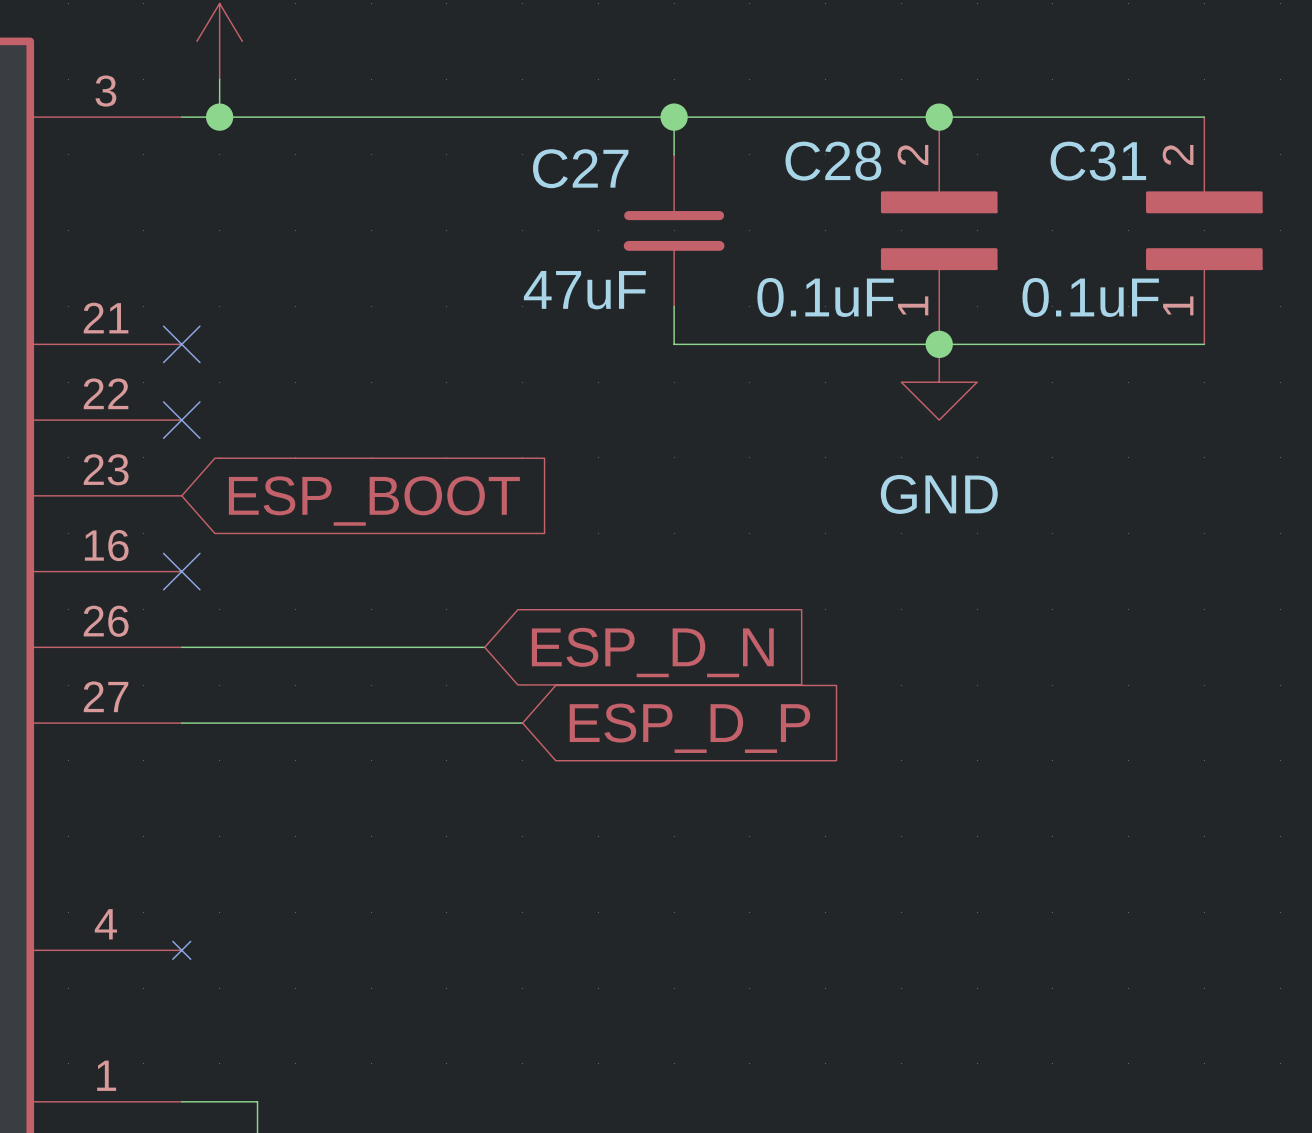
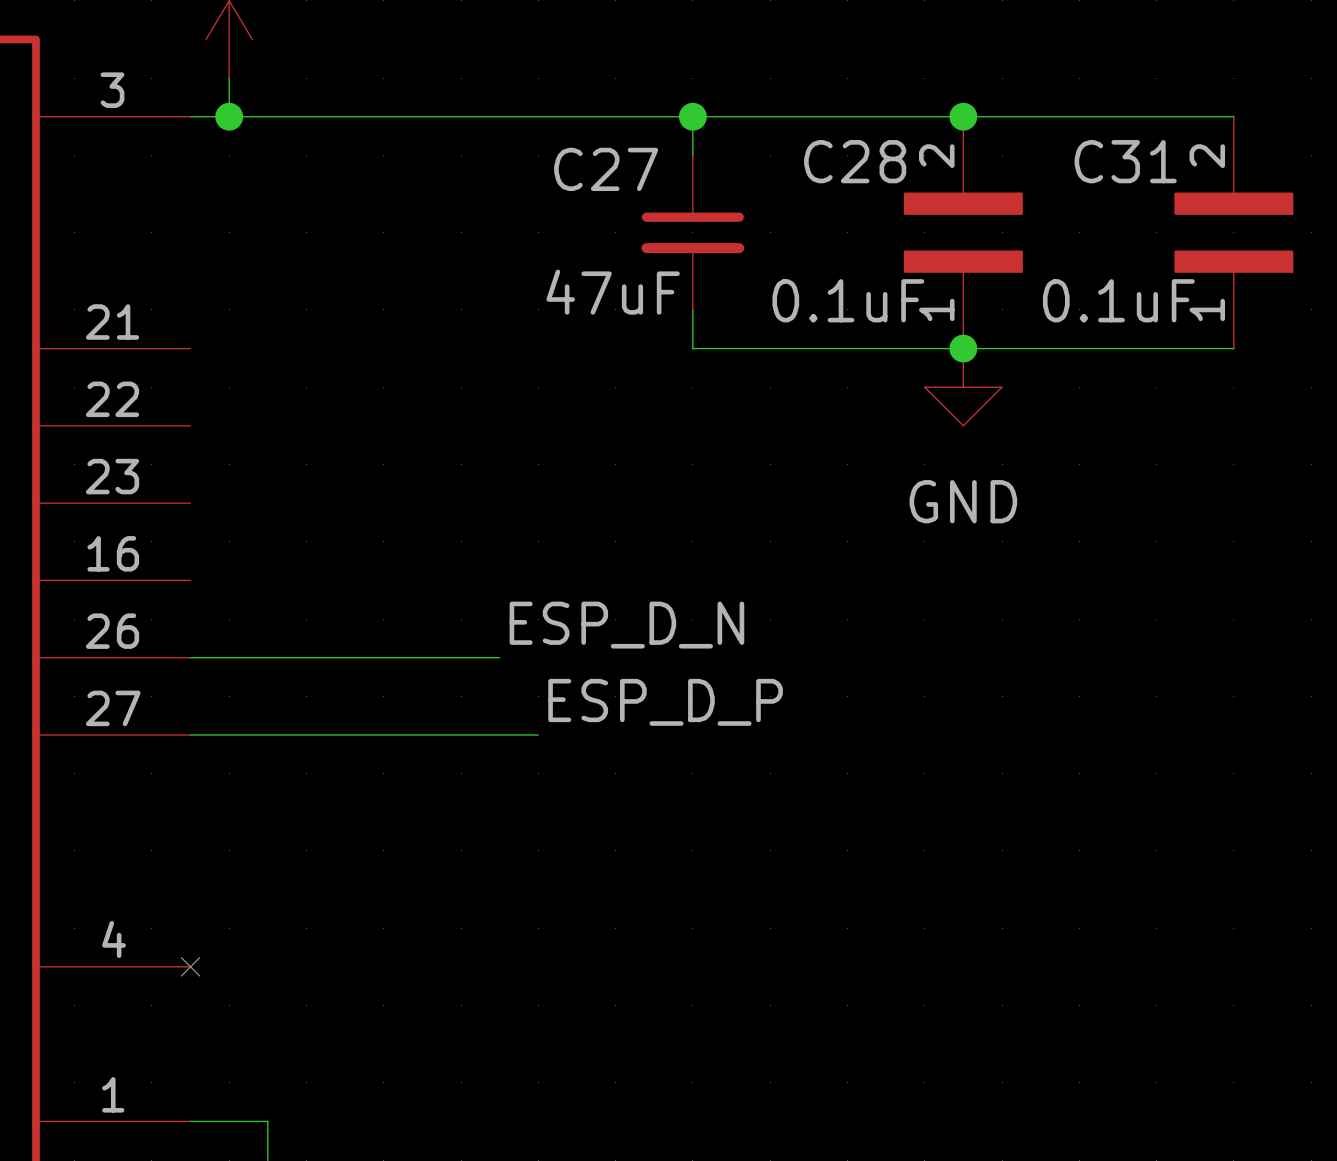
no-connect mark: (181, 344) -> none
no-connect mark: (181, 420) -> none
global label: ESP_BOOT (374, 501) -> none
no-connect mark: (181, 571) -> none
label: none -> ESP_D_N (626, 625)
global label: ESP_D_N (652, 652) -> none
label: none -> ESP_D_P (665, 702)
global label: ESP_D_P (689, 728) -> none

